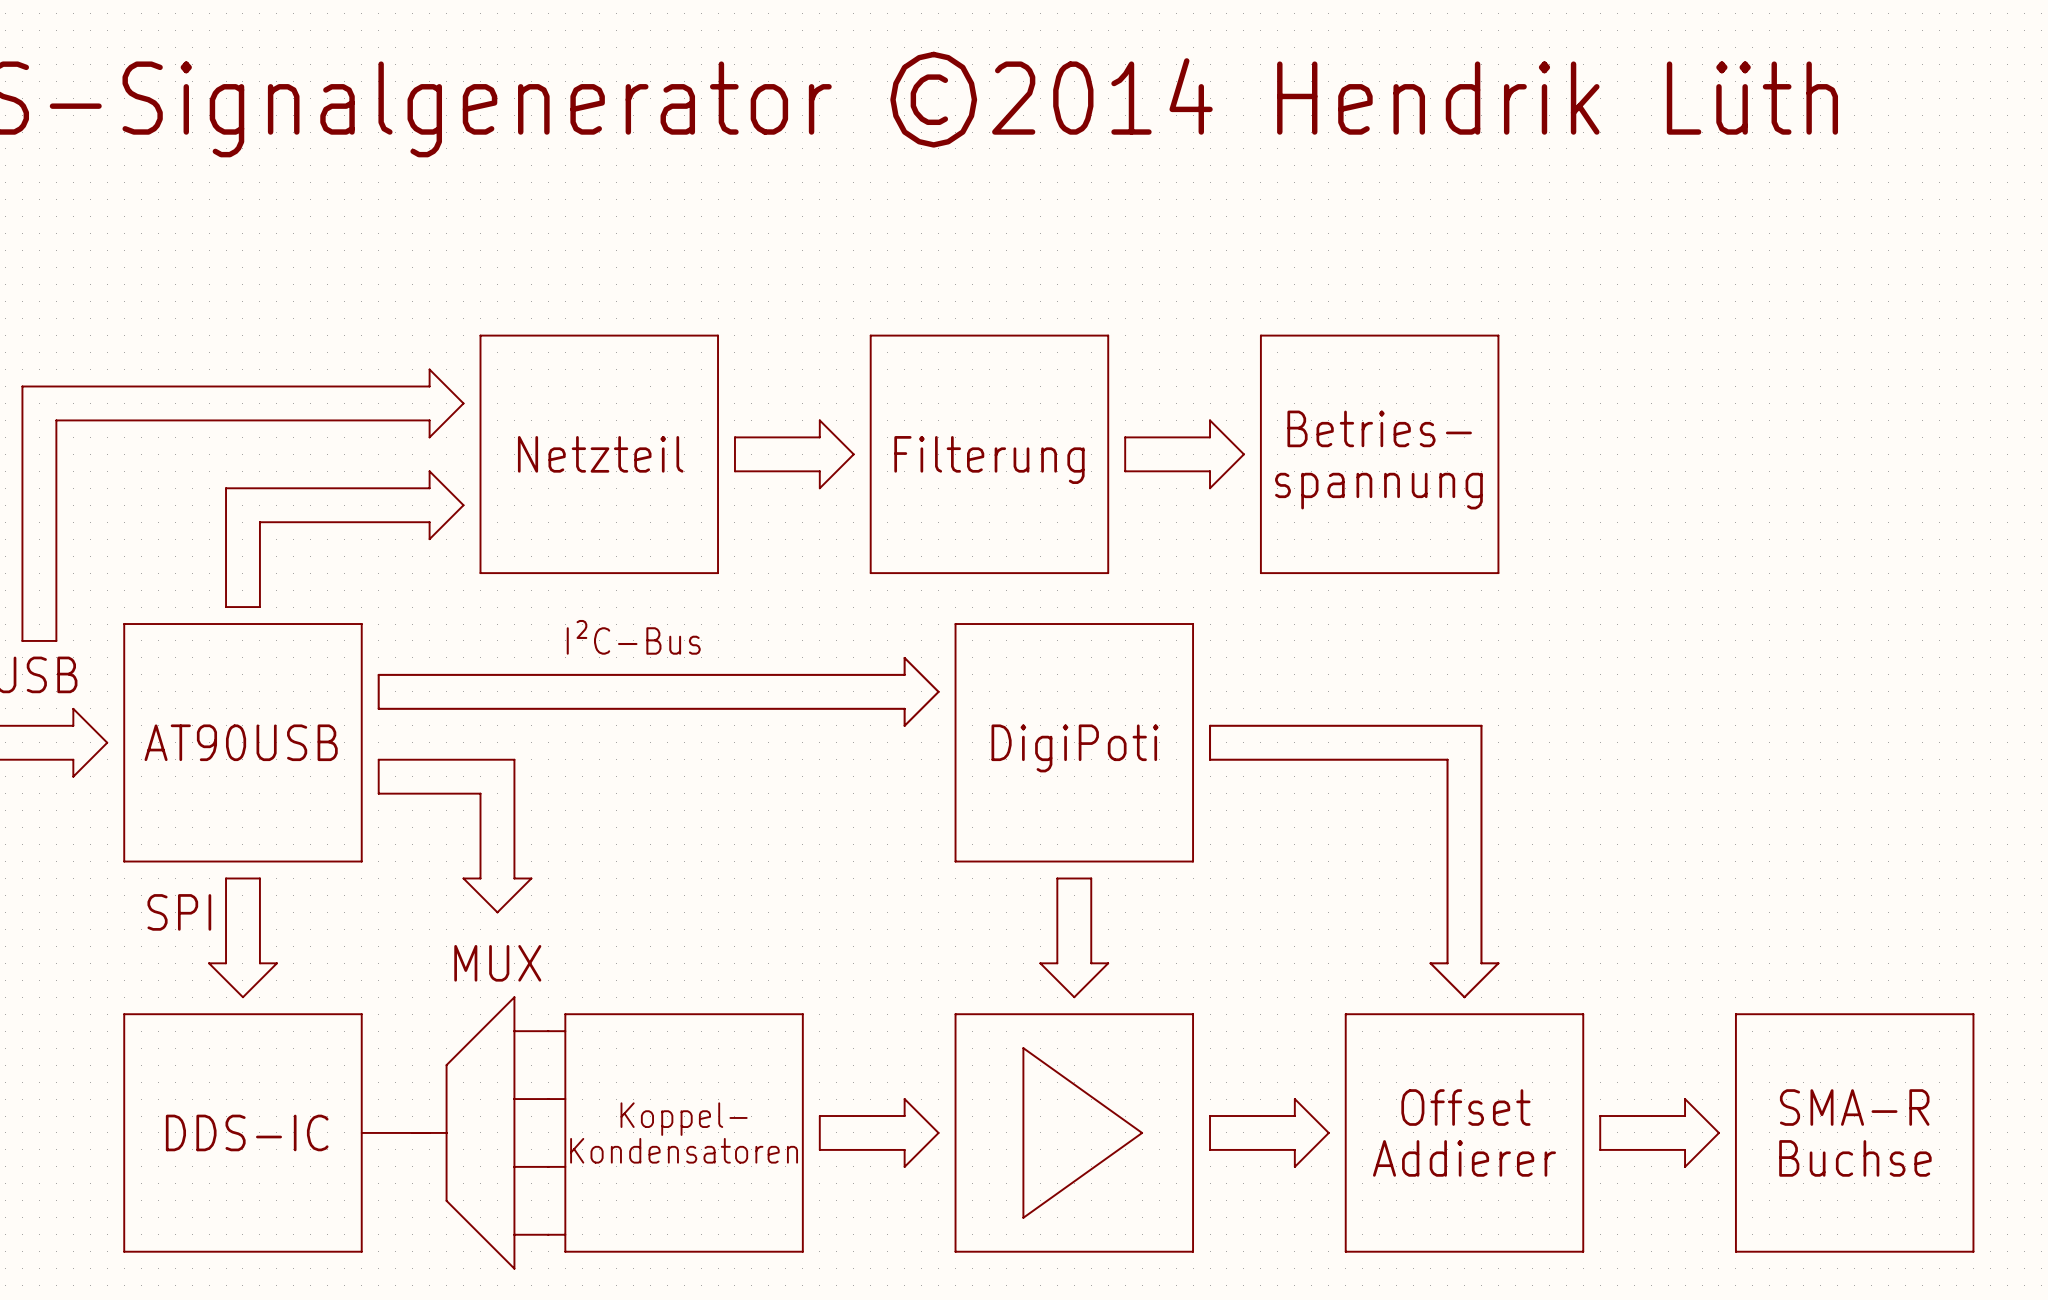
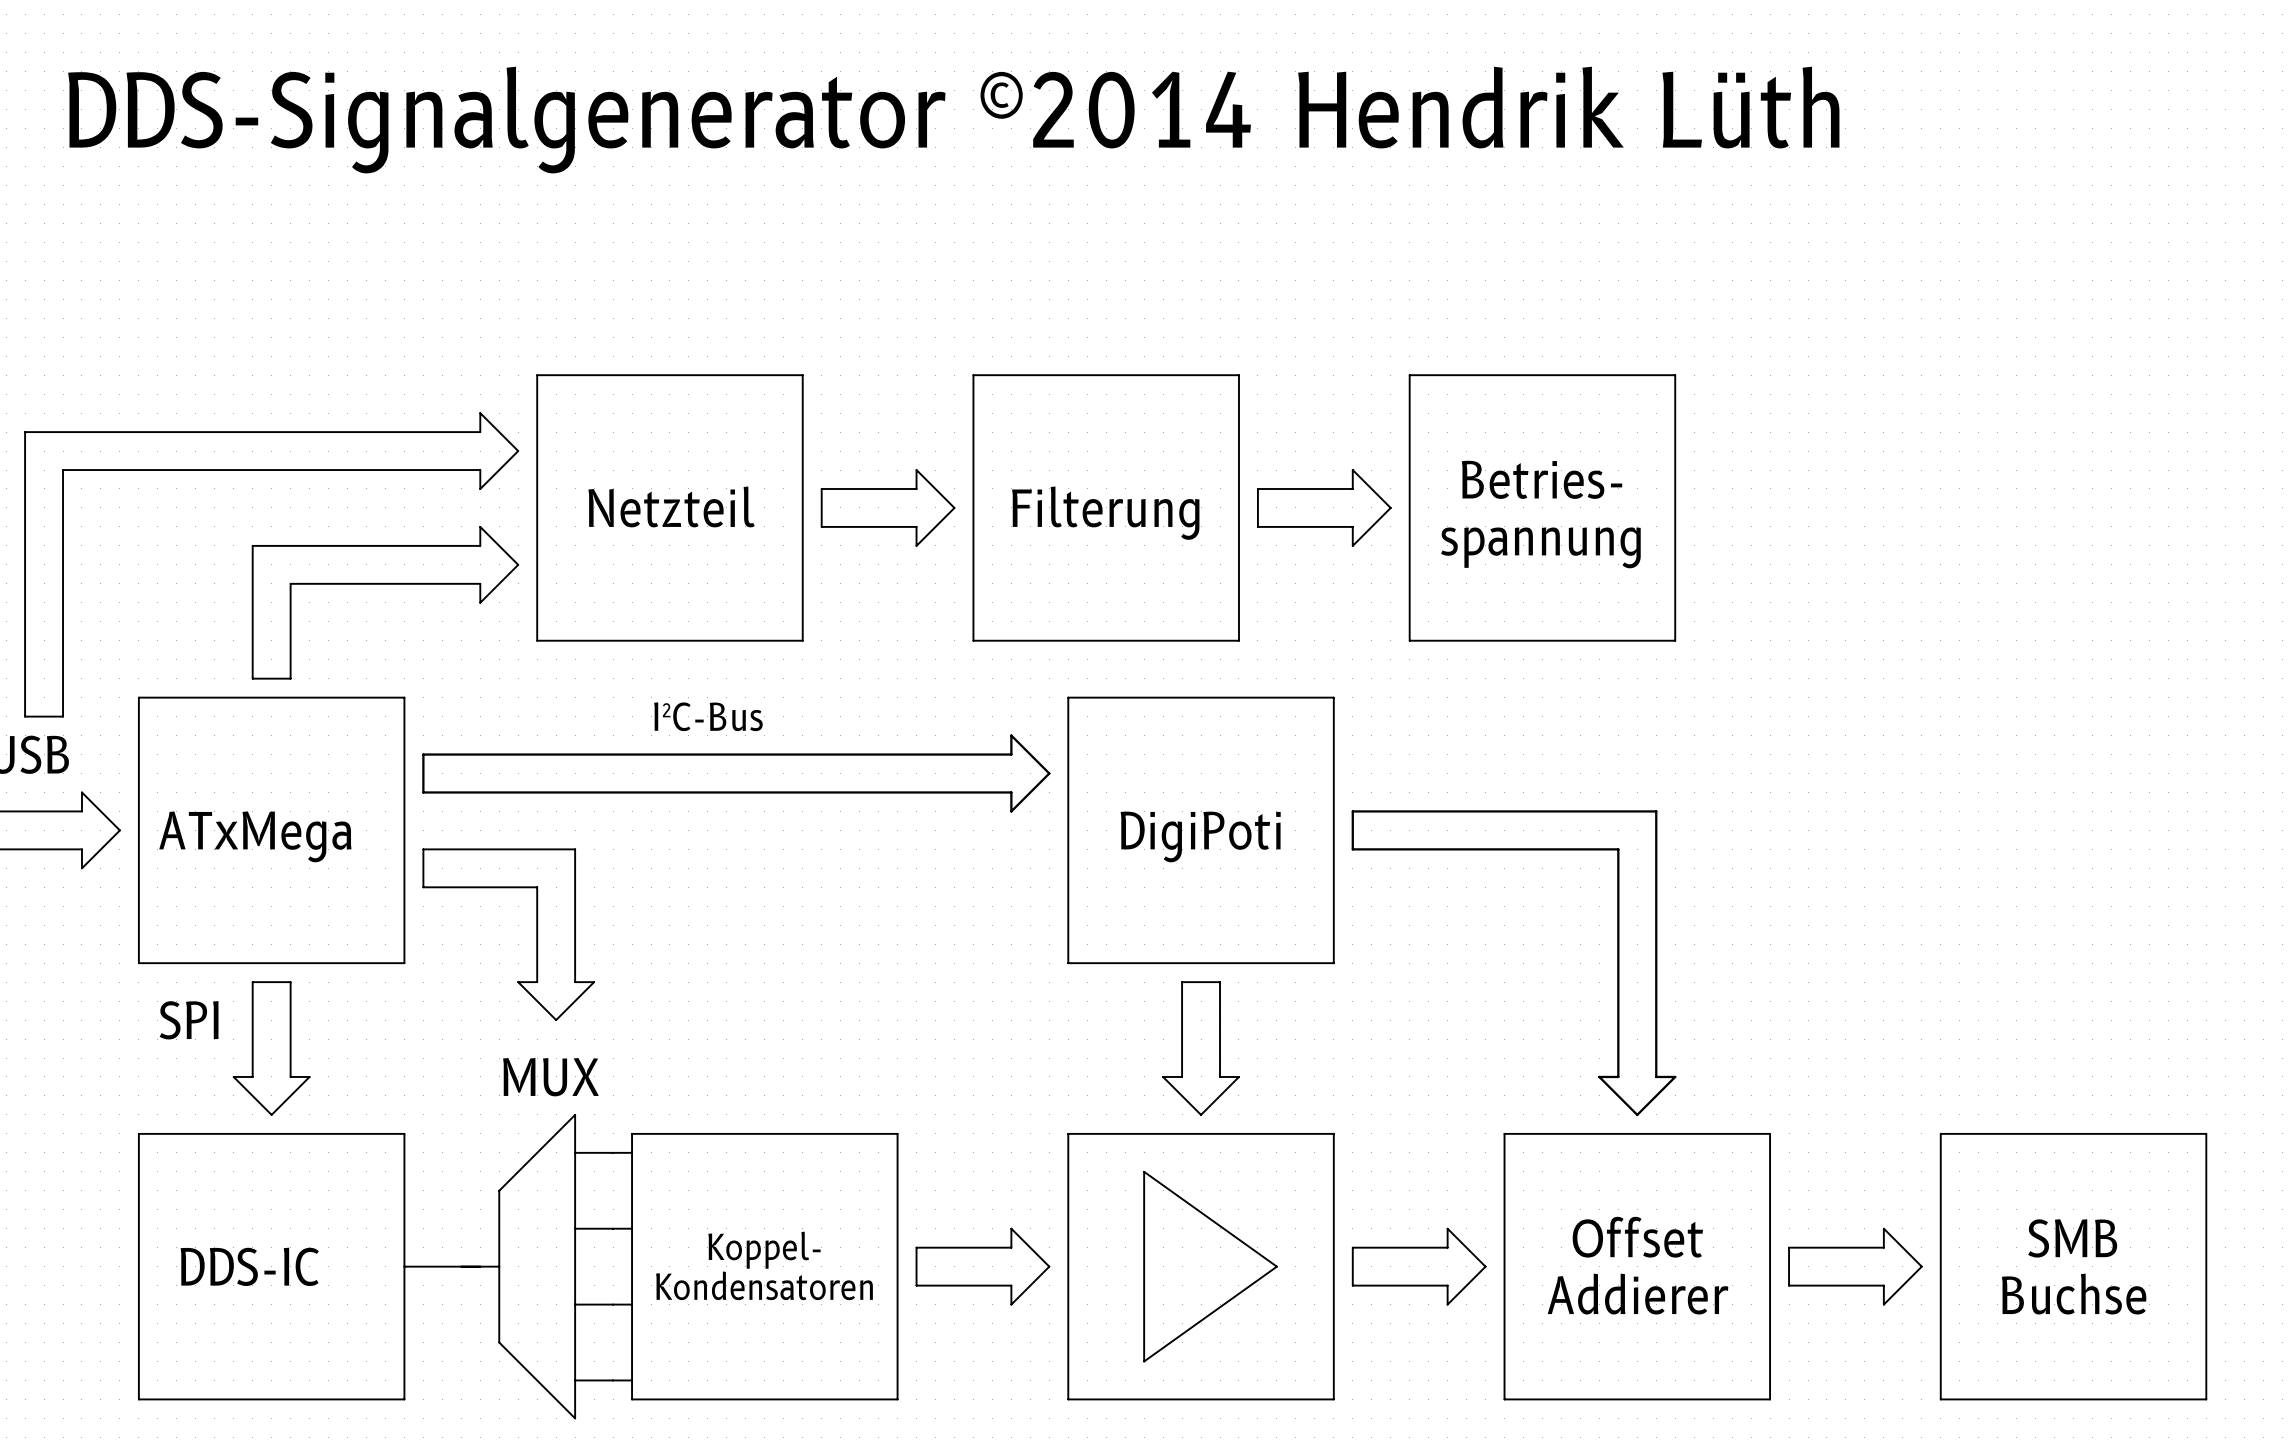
text: AT90USB (241, 742) -> ATxMega (255, 836)
text: SMA-R (1854, 1107) -> SMB (2072, 1238)

